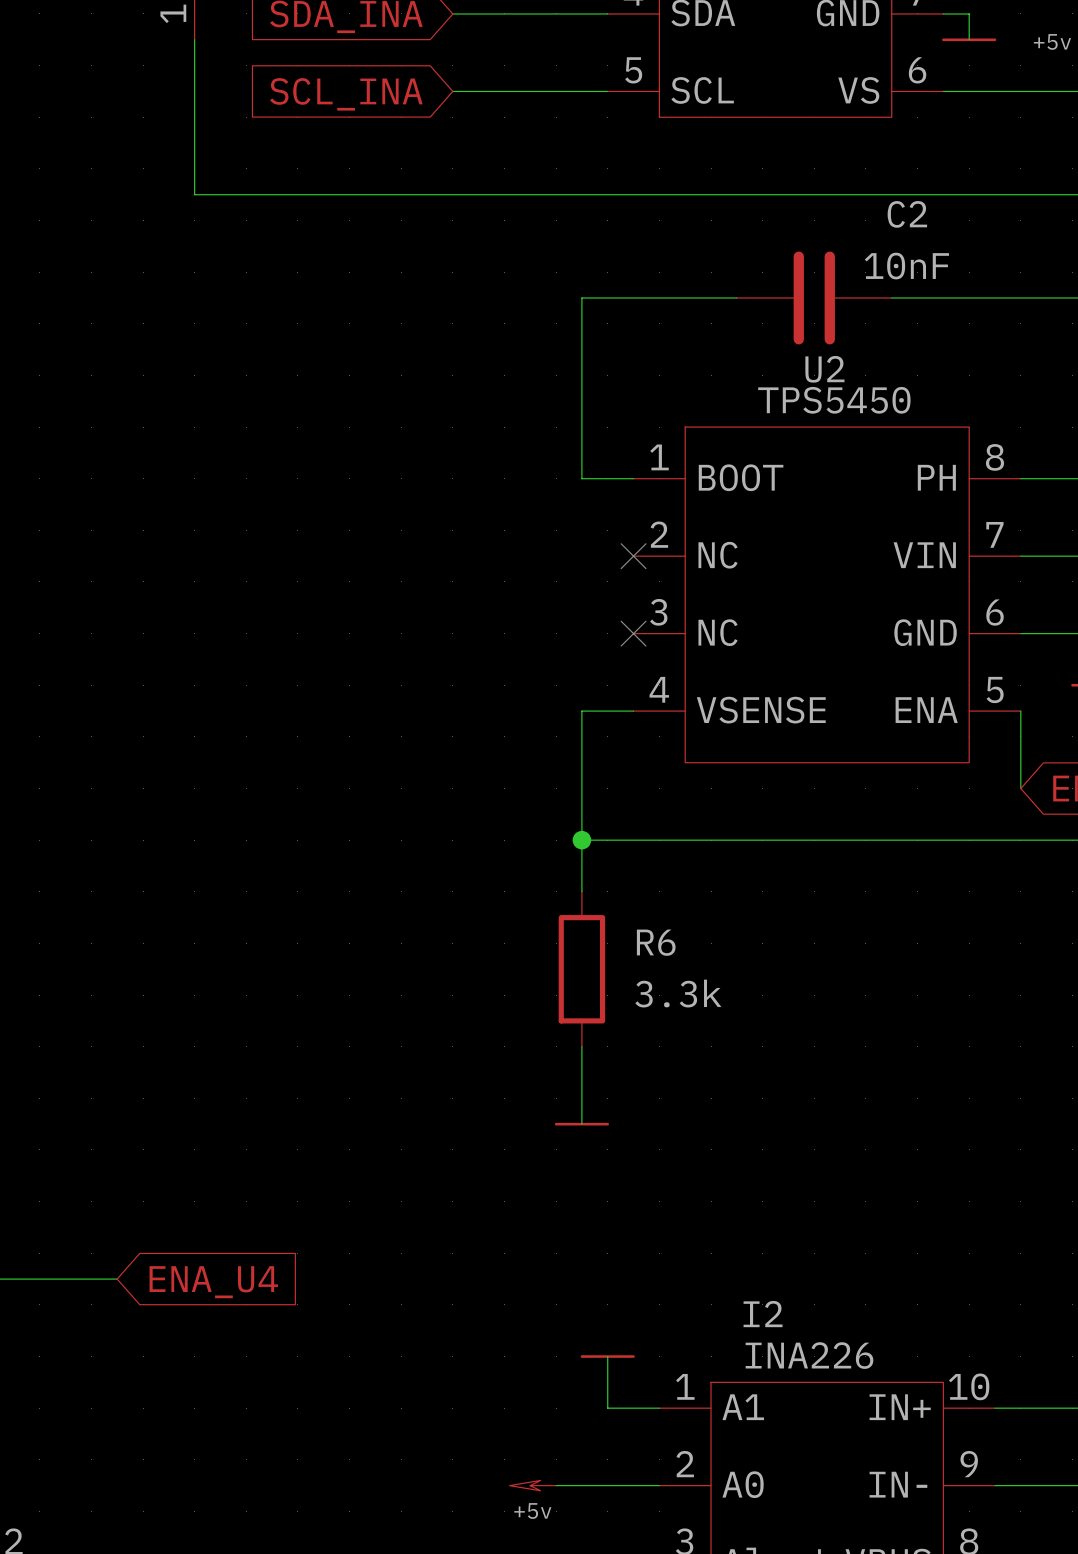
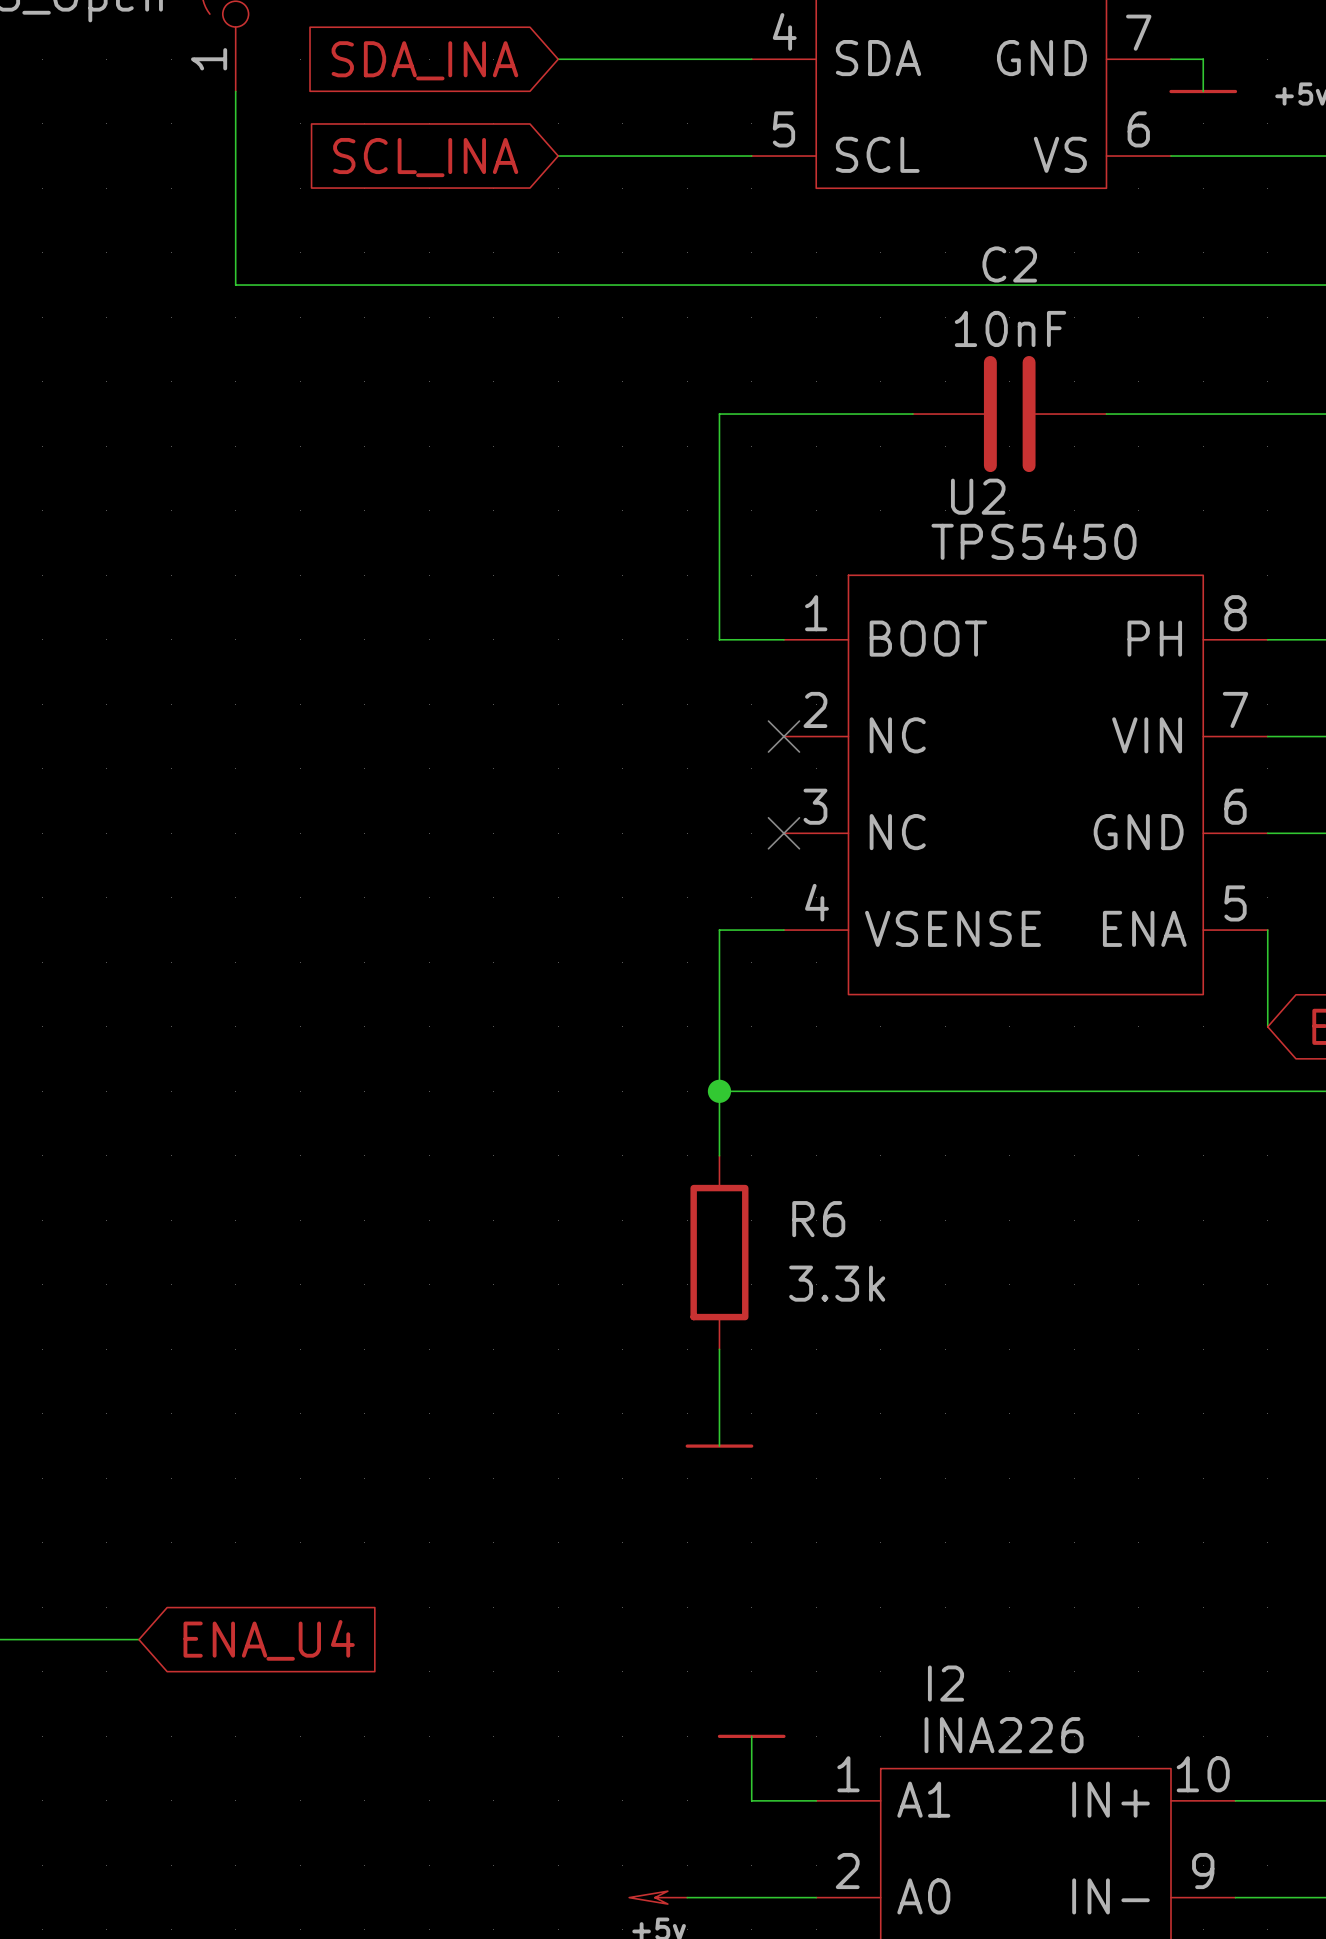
C2 name position: C2 (907, 214) -> C2 (1009, 264)
C2 value position: 10nF (906, 266) -> 10nF (1010, 328)
U2 name position: U2 (824, 369) -> U2 (978, 496)

